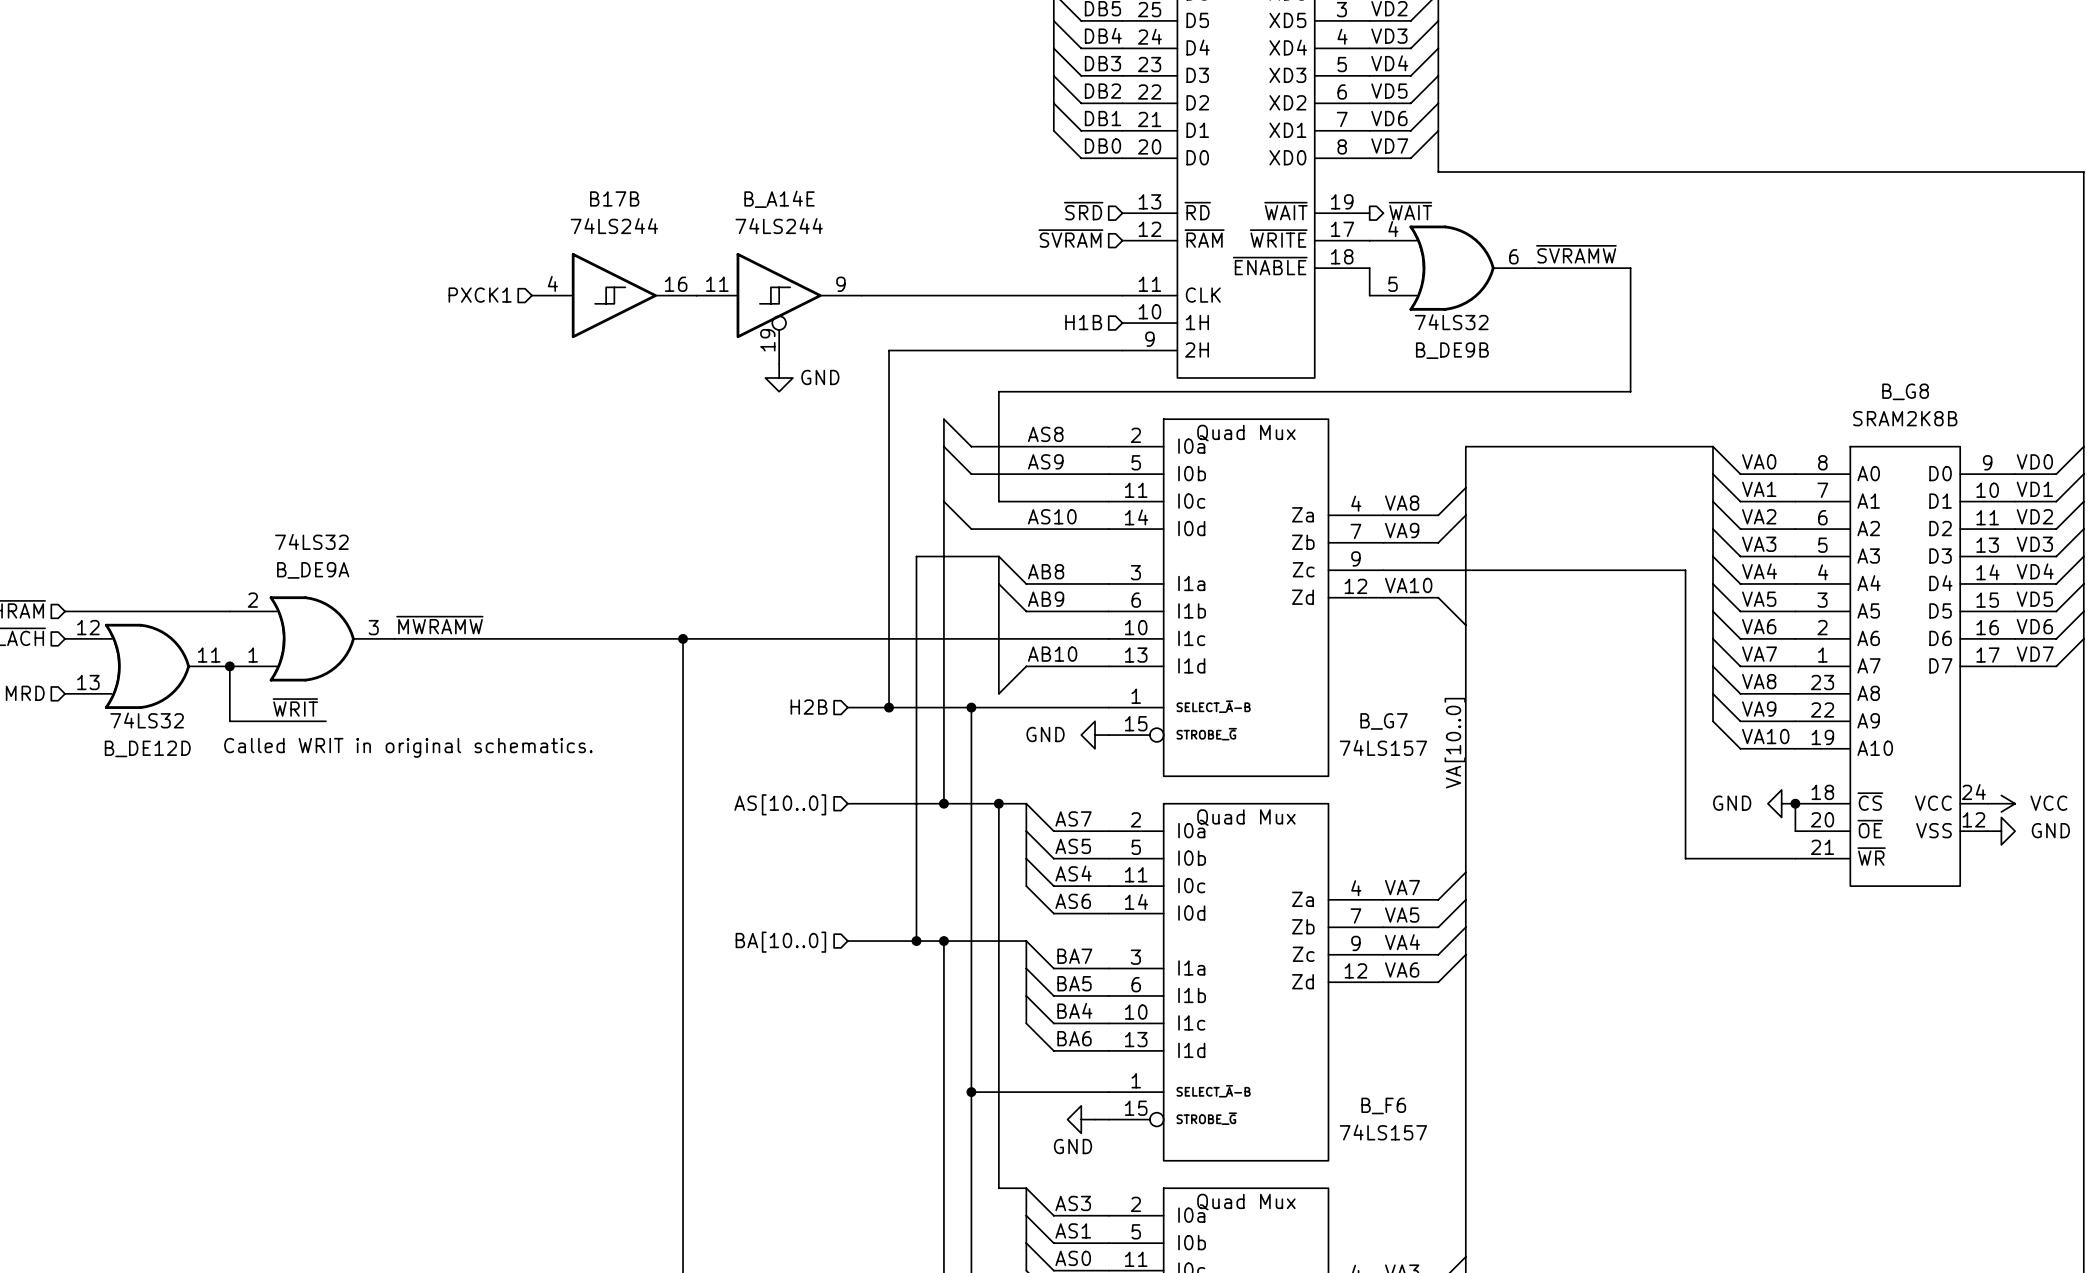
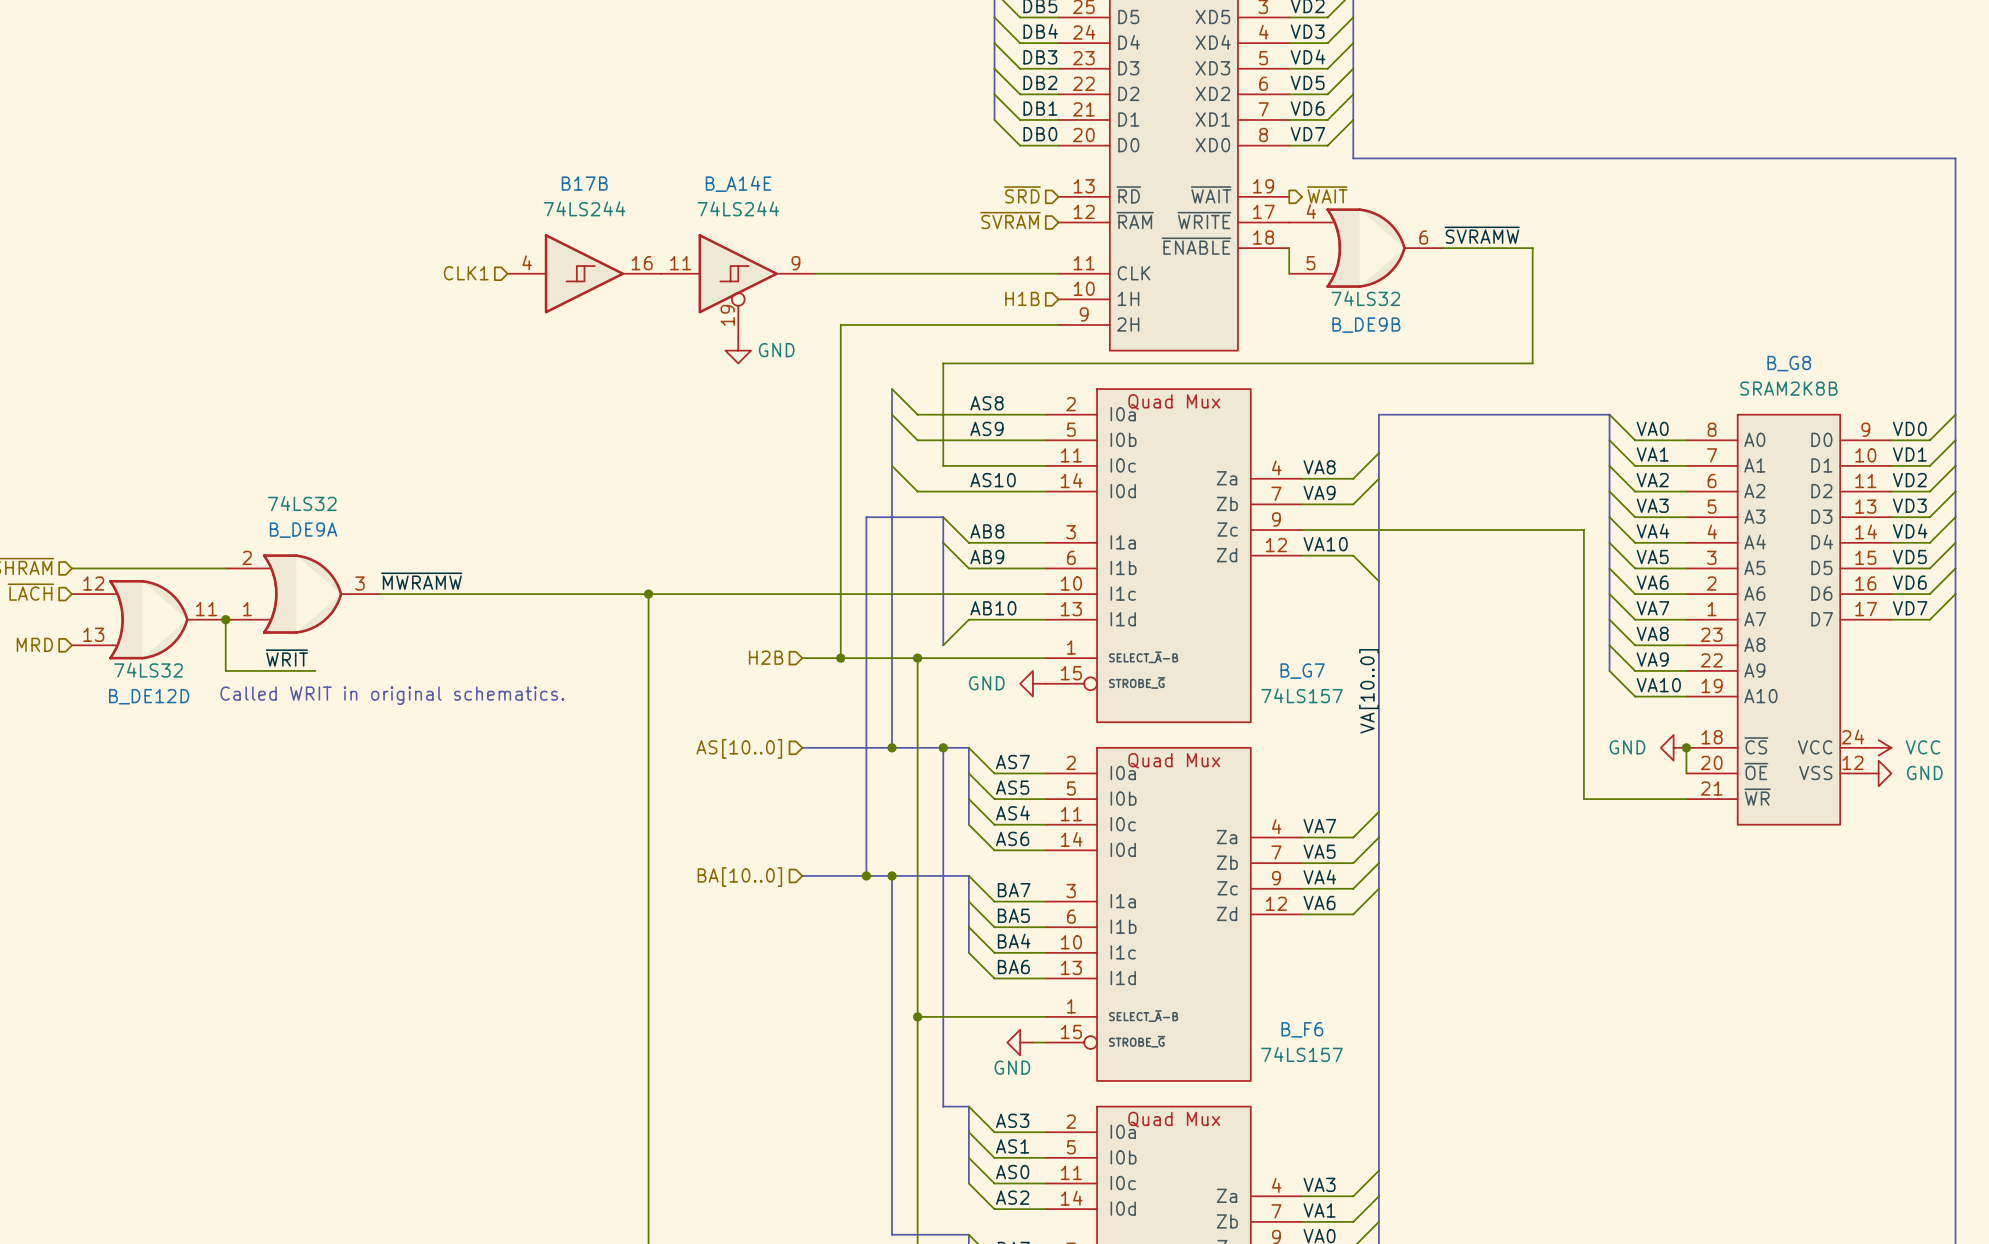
hierarchical label: PXCK1 (480, 295) -> CLK1 (466, 273)

